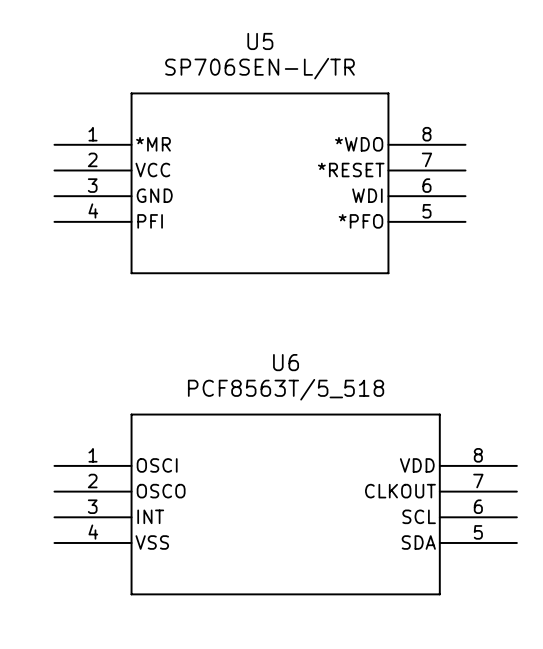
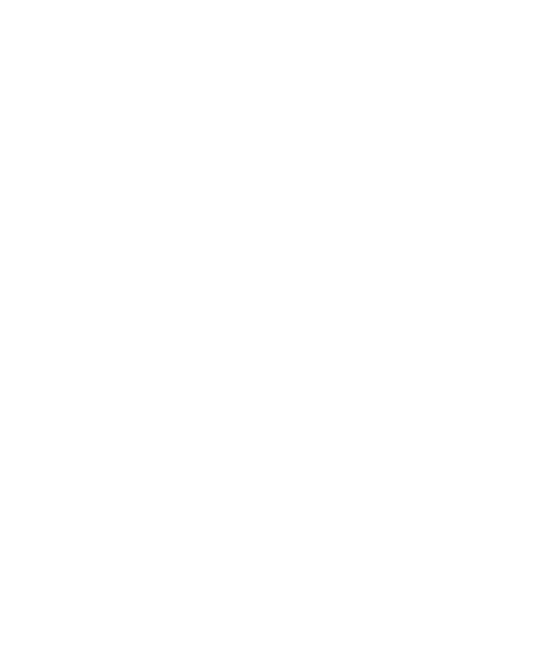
U5: SP706SEN-L/TR (259, 183) -> none
U6: PCF8563T/5_518 (285, 504) -> none

